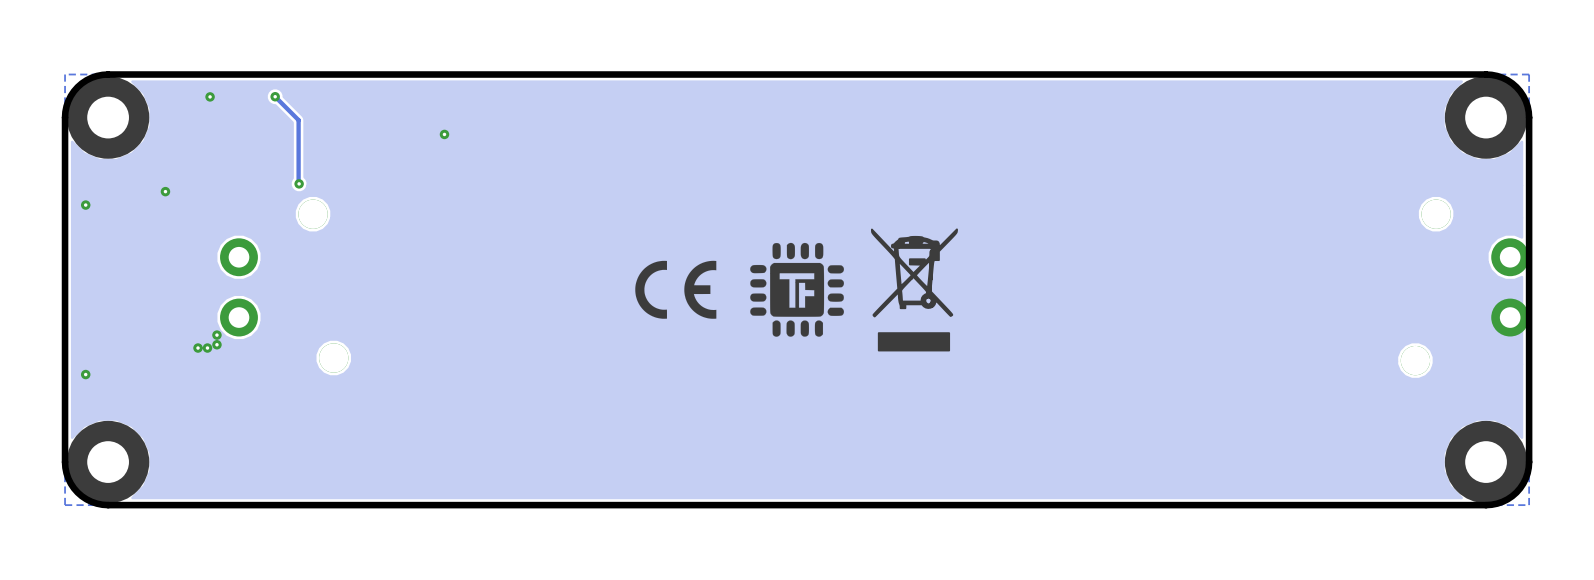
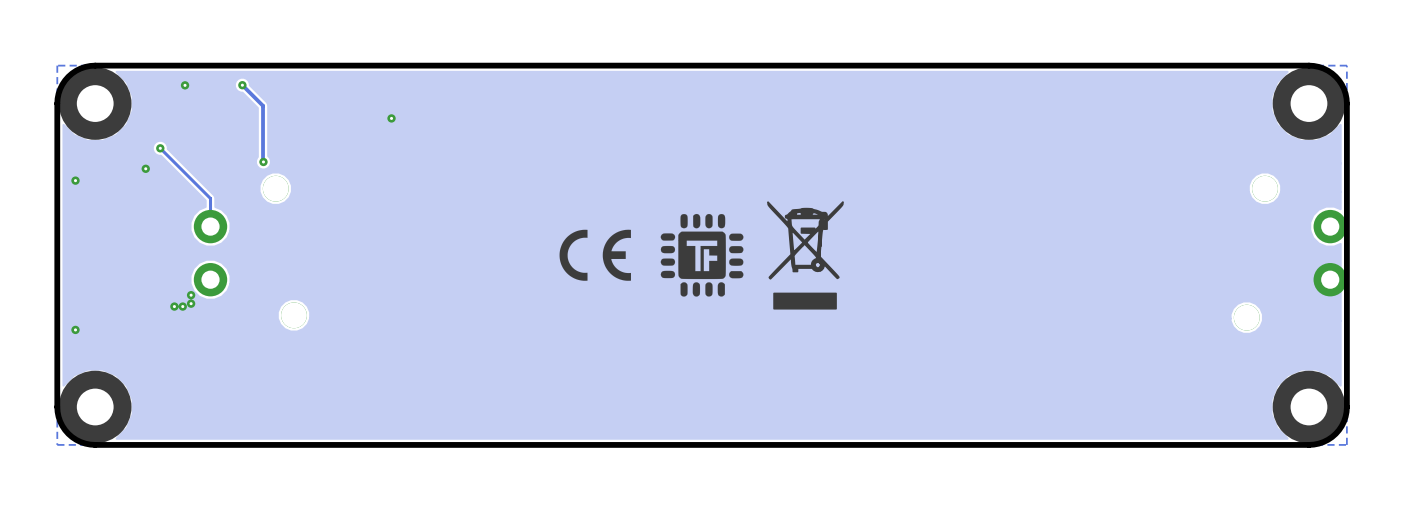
track: none -> (160, 148) (210, 198) (210, 226)
via: none -> (160, 148)

